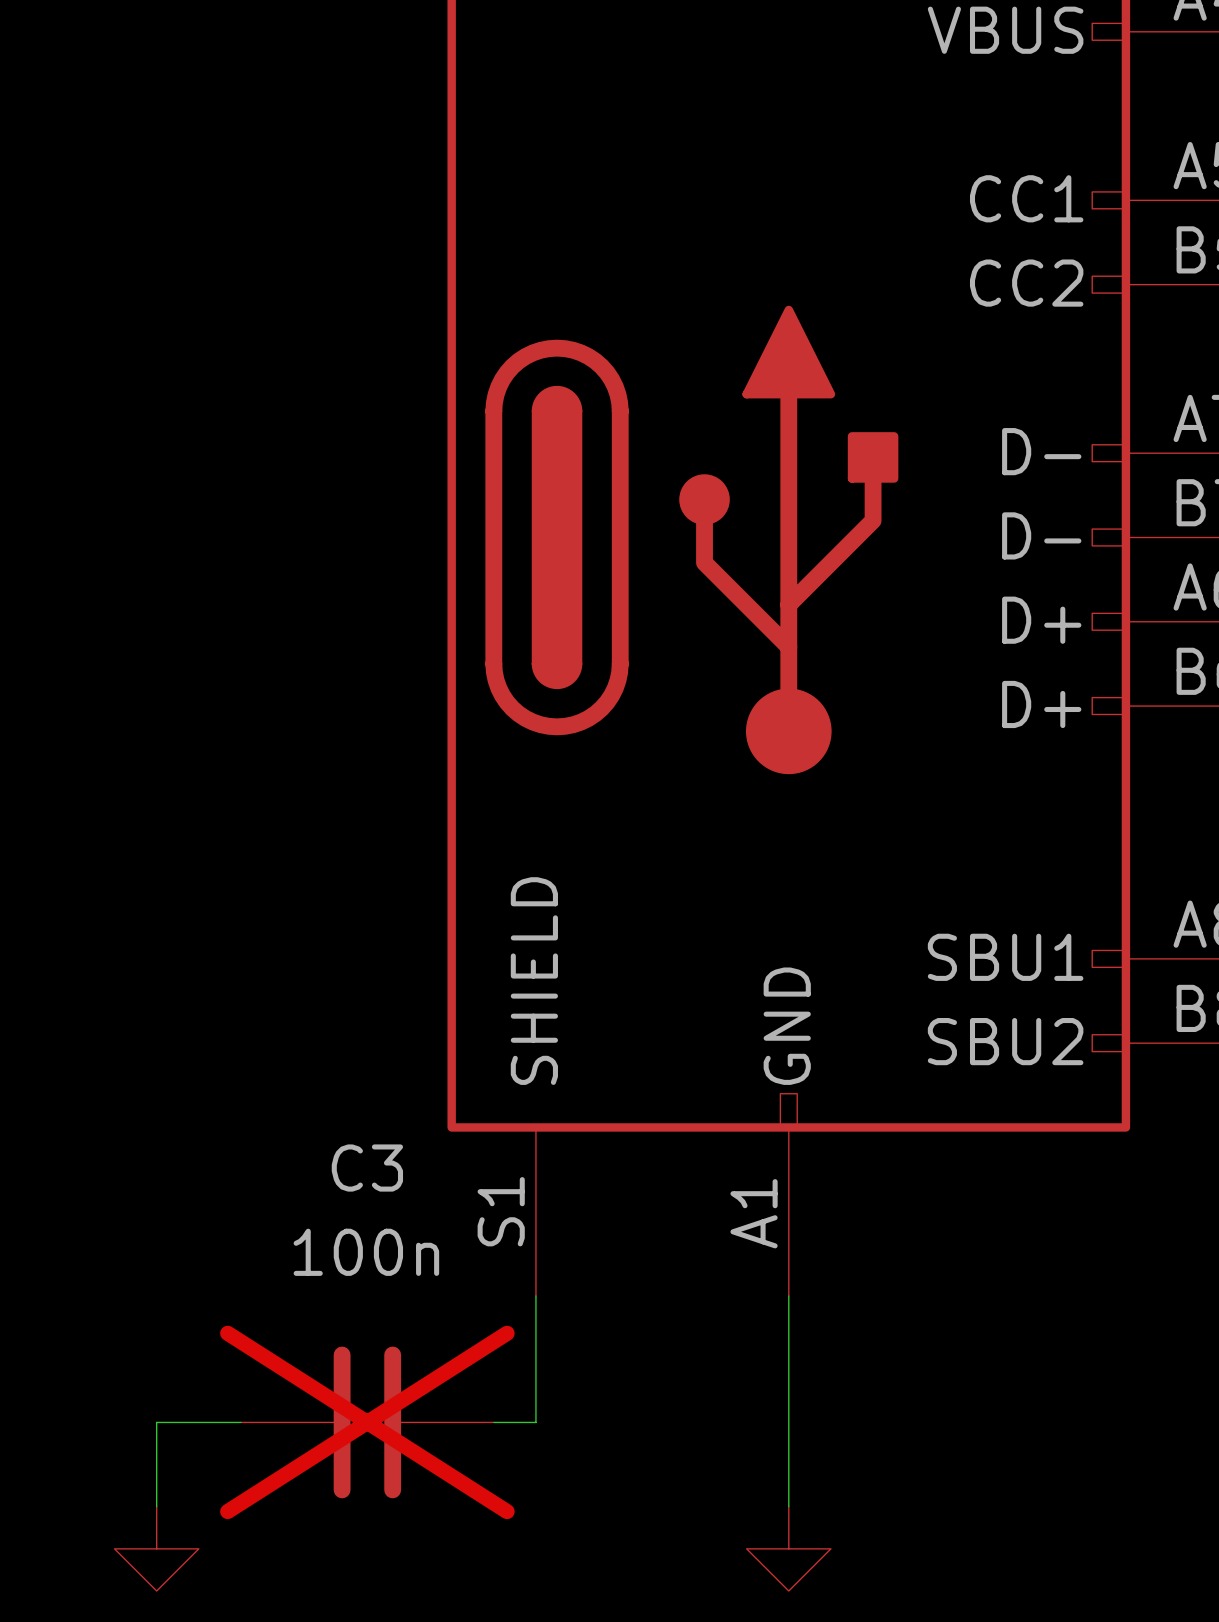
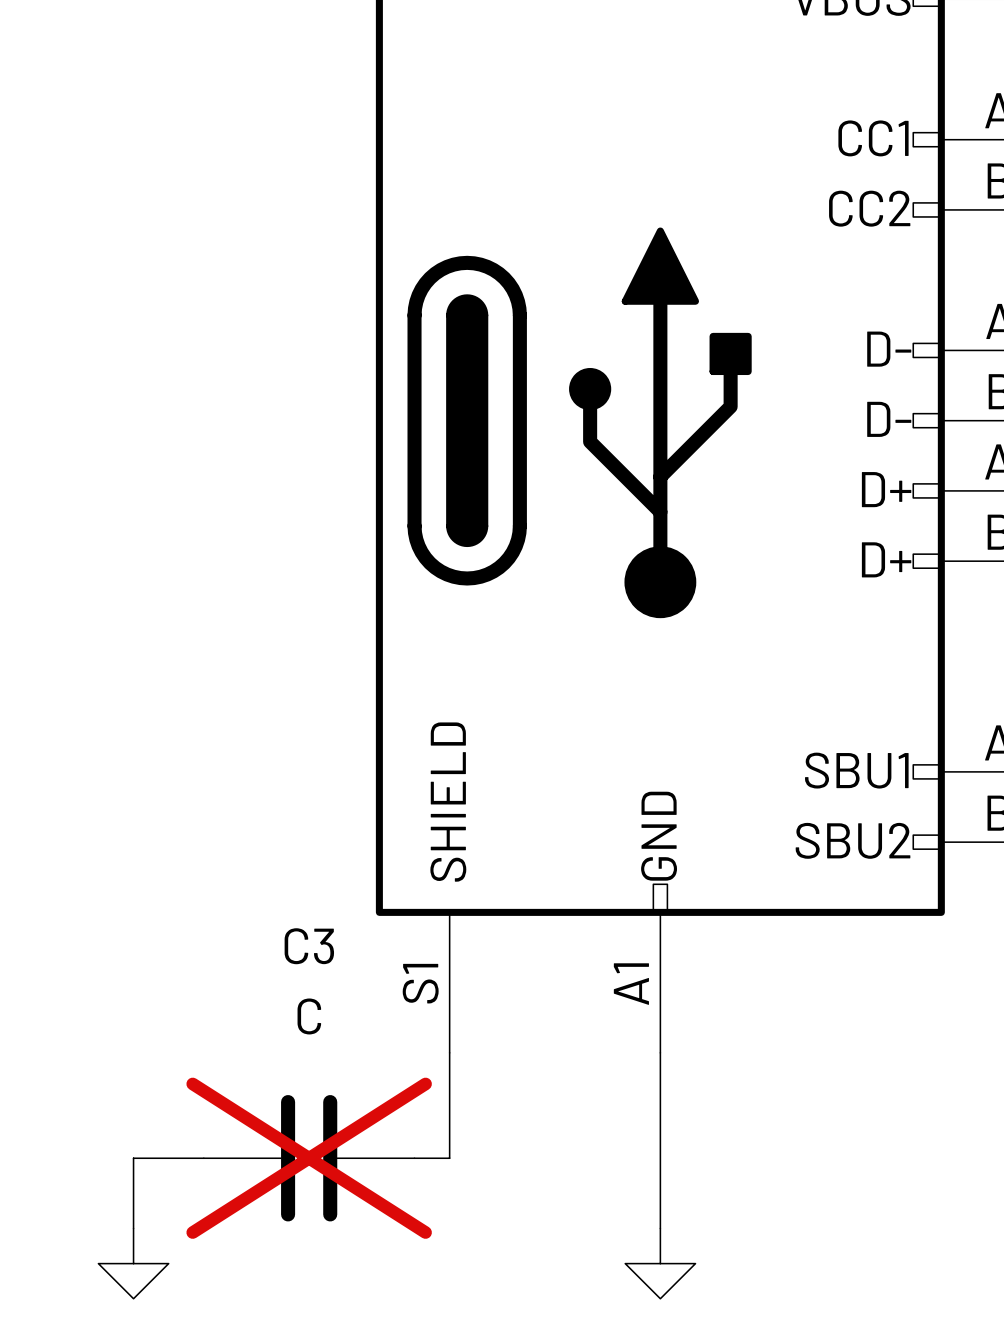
C3 value: 100n (366, 1252) -> C (309, 1016)

